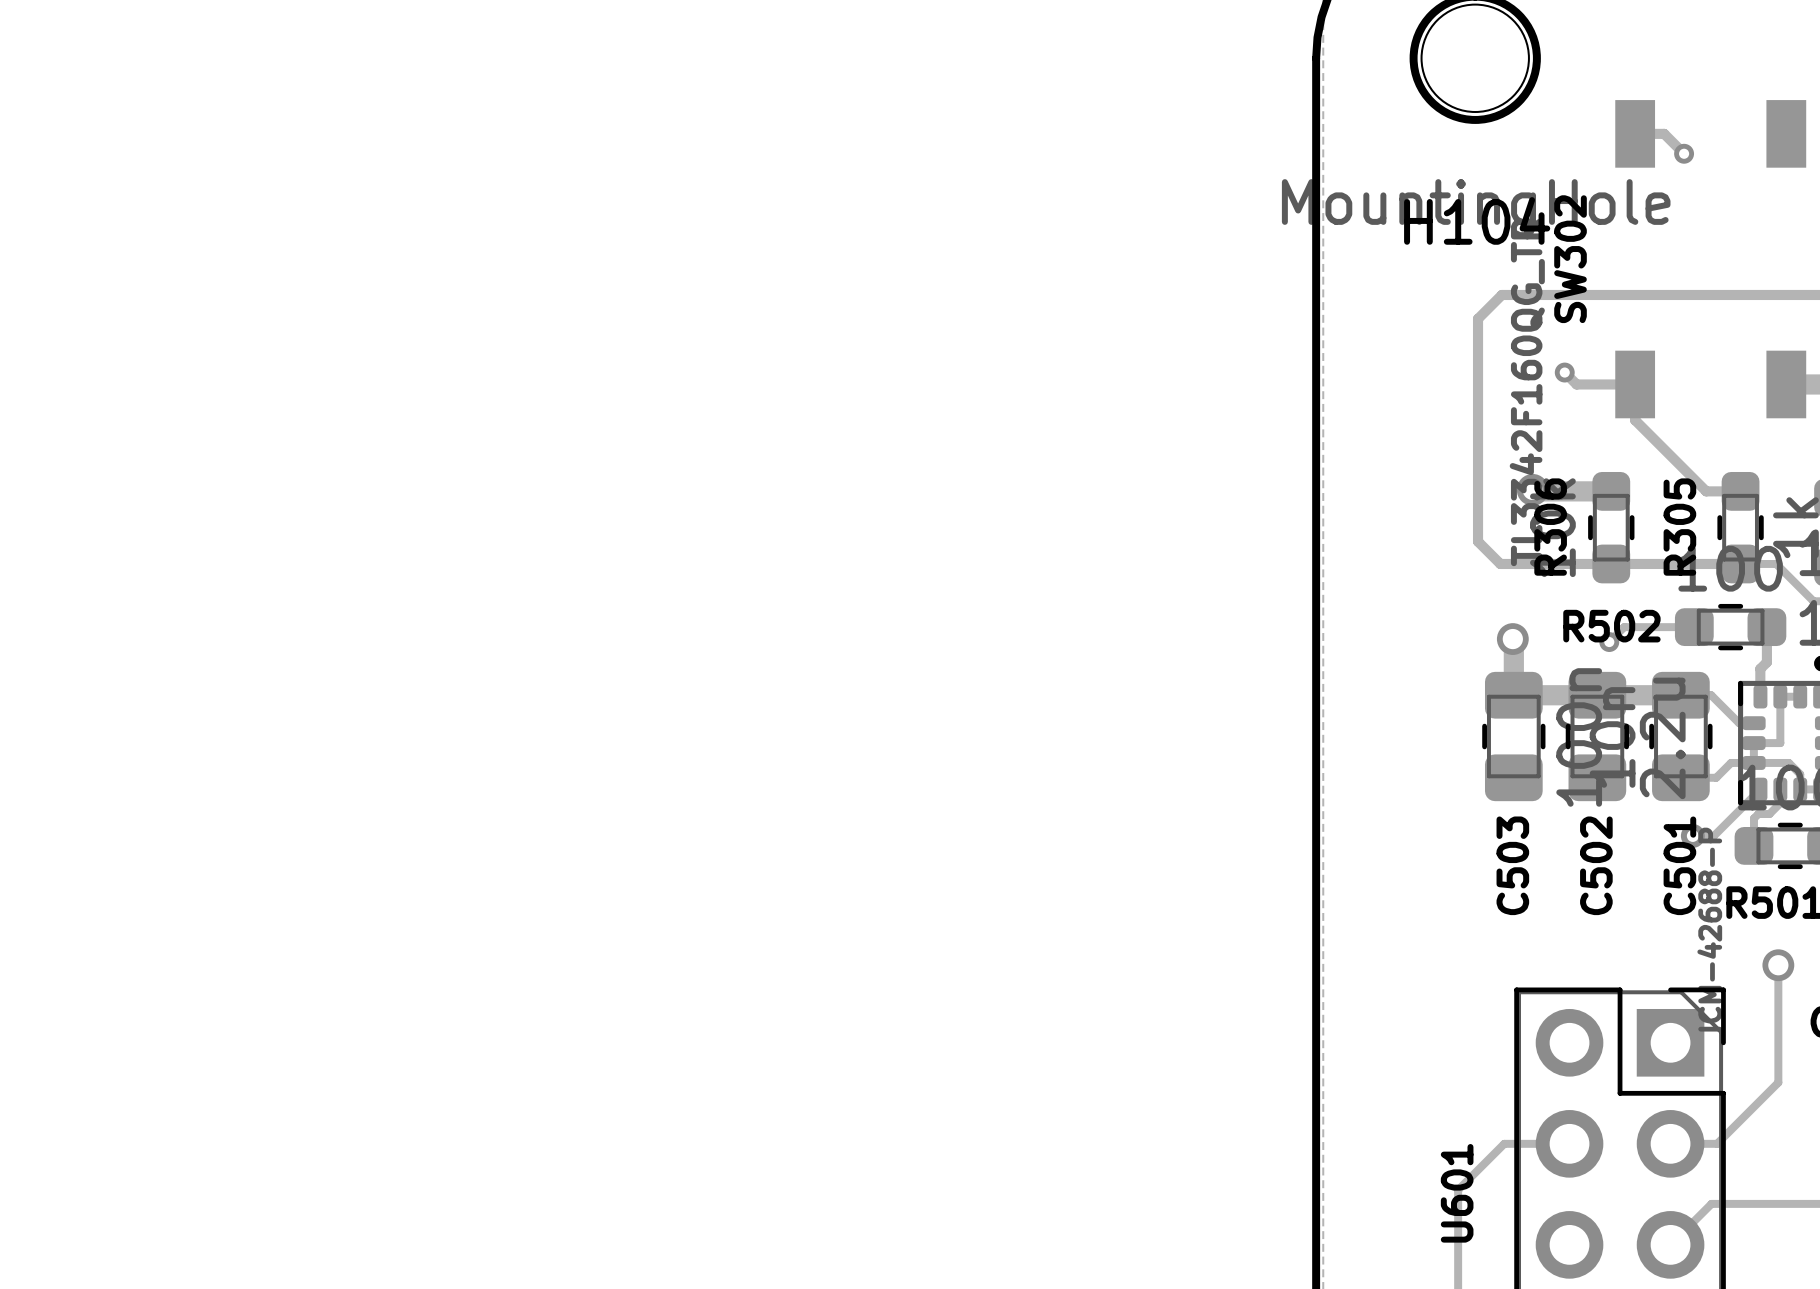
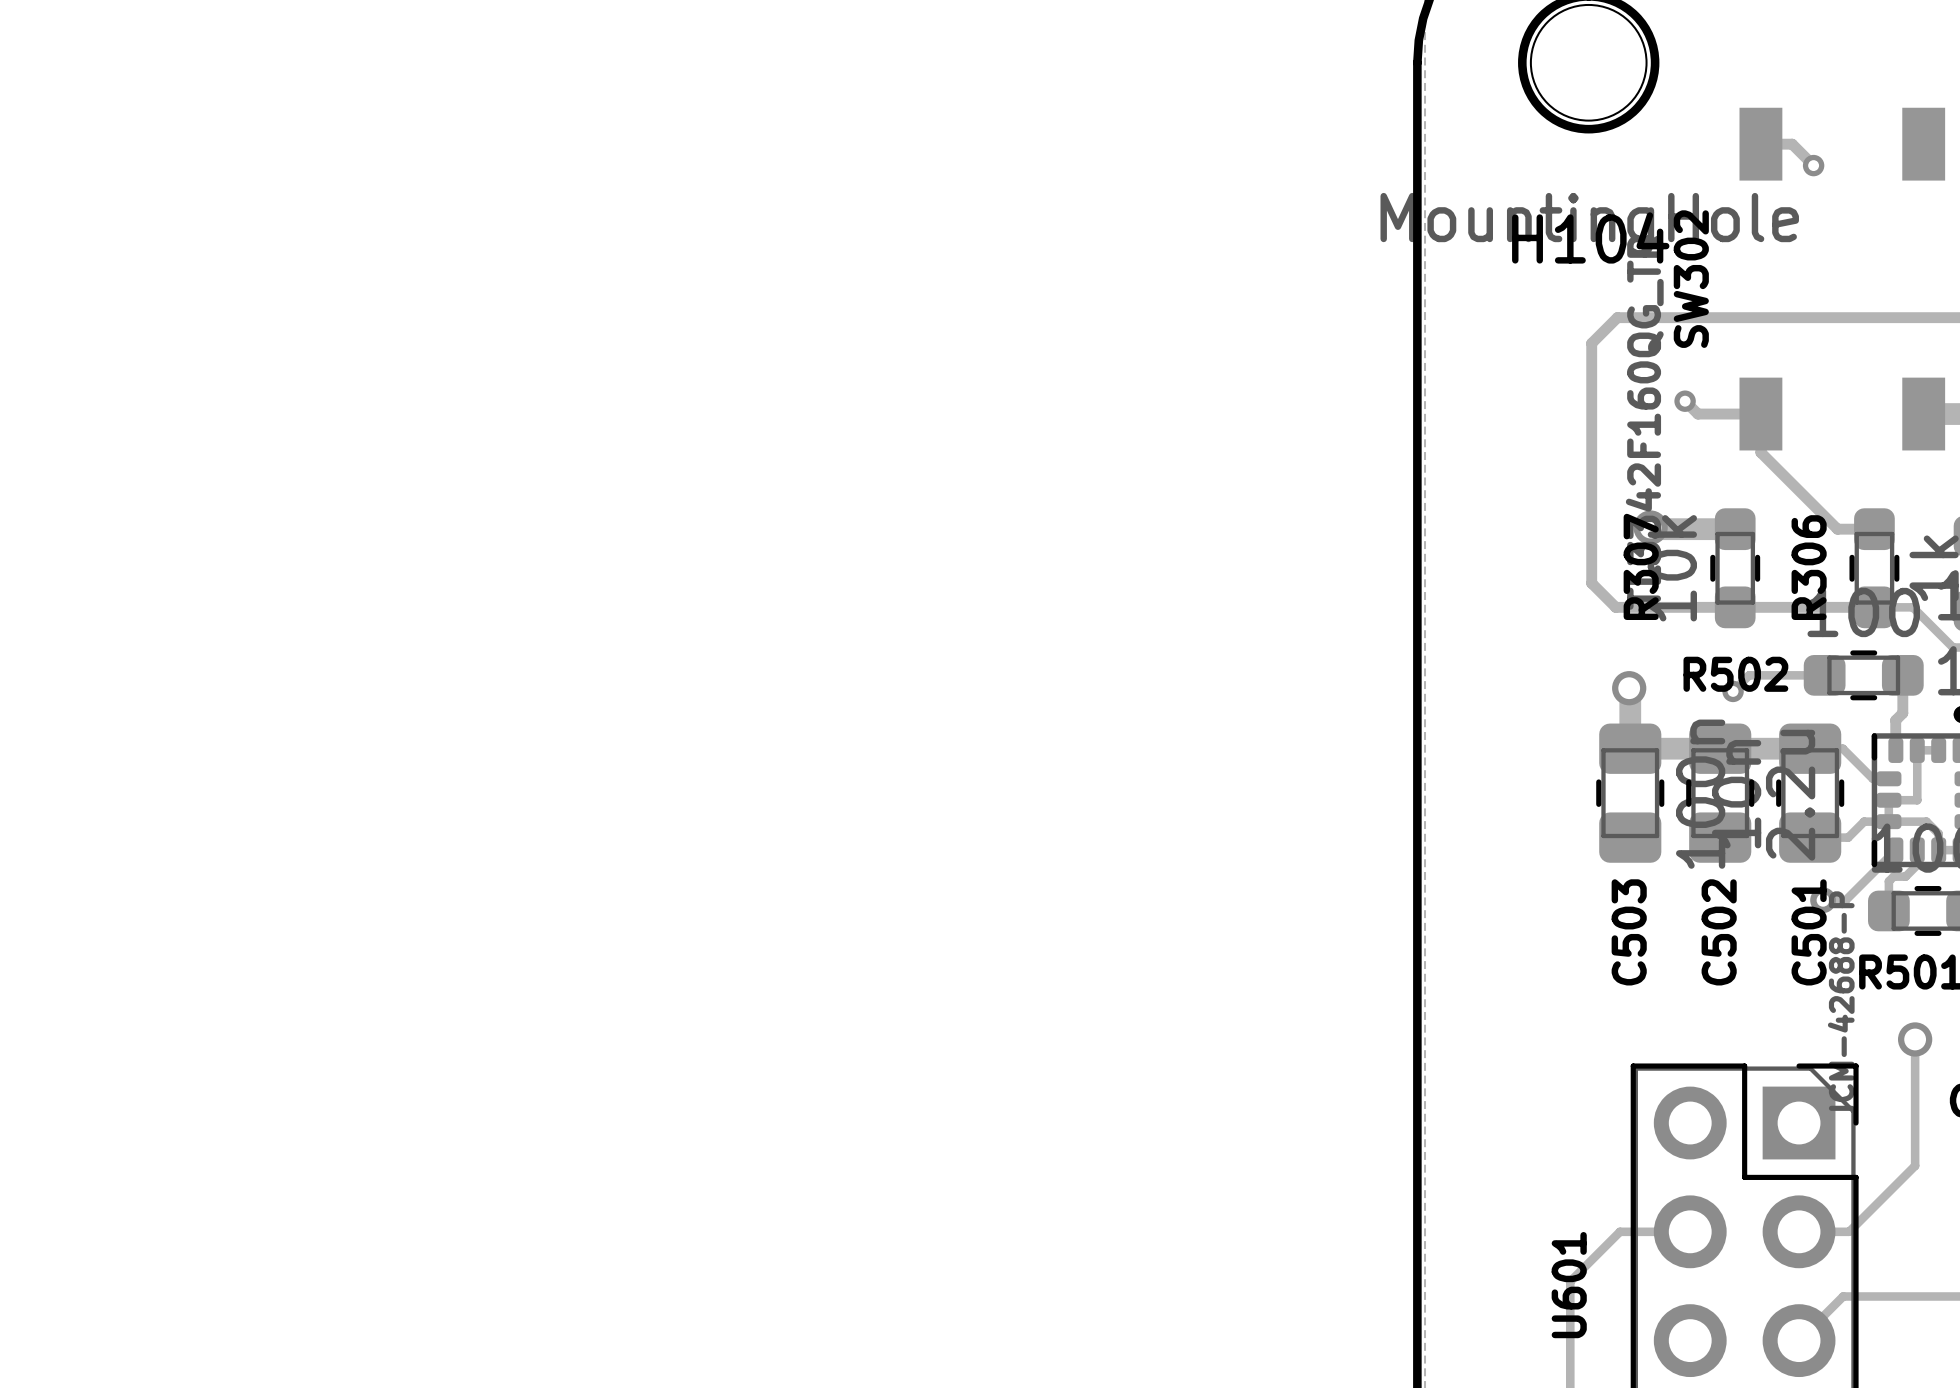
R306 name: R306 (1550, 527) -> R307 (1641, 566)
R305 name: R305 (1679, 527) -> R306 (1809, 567)

